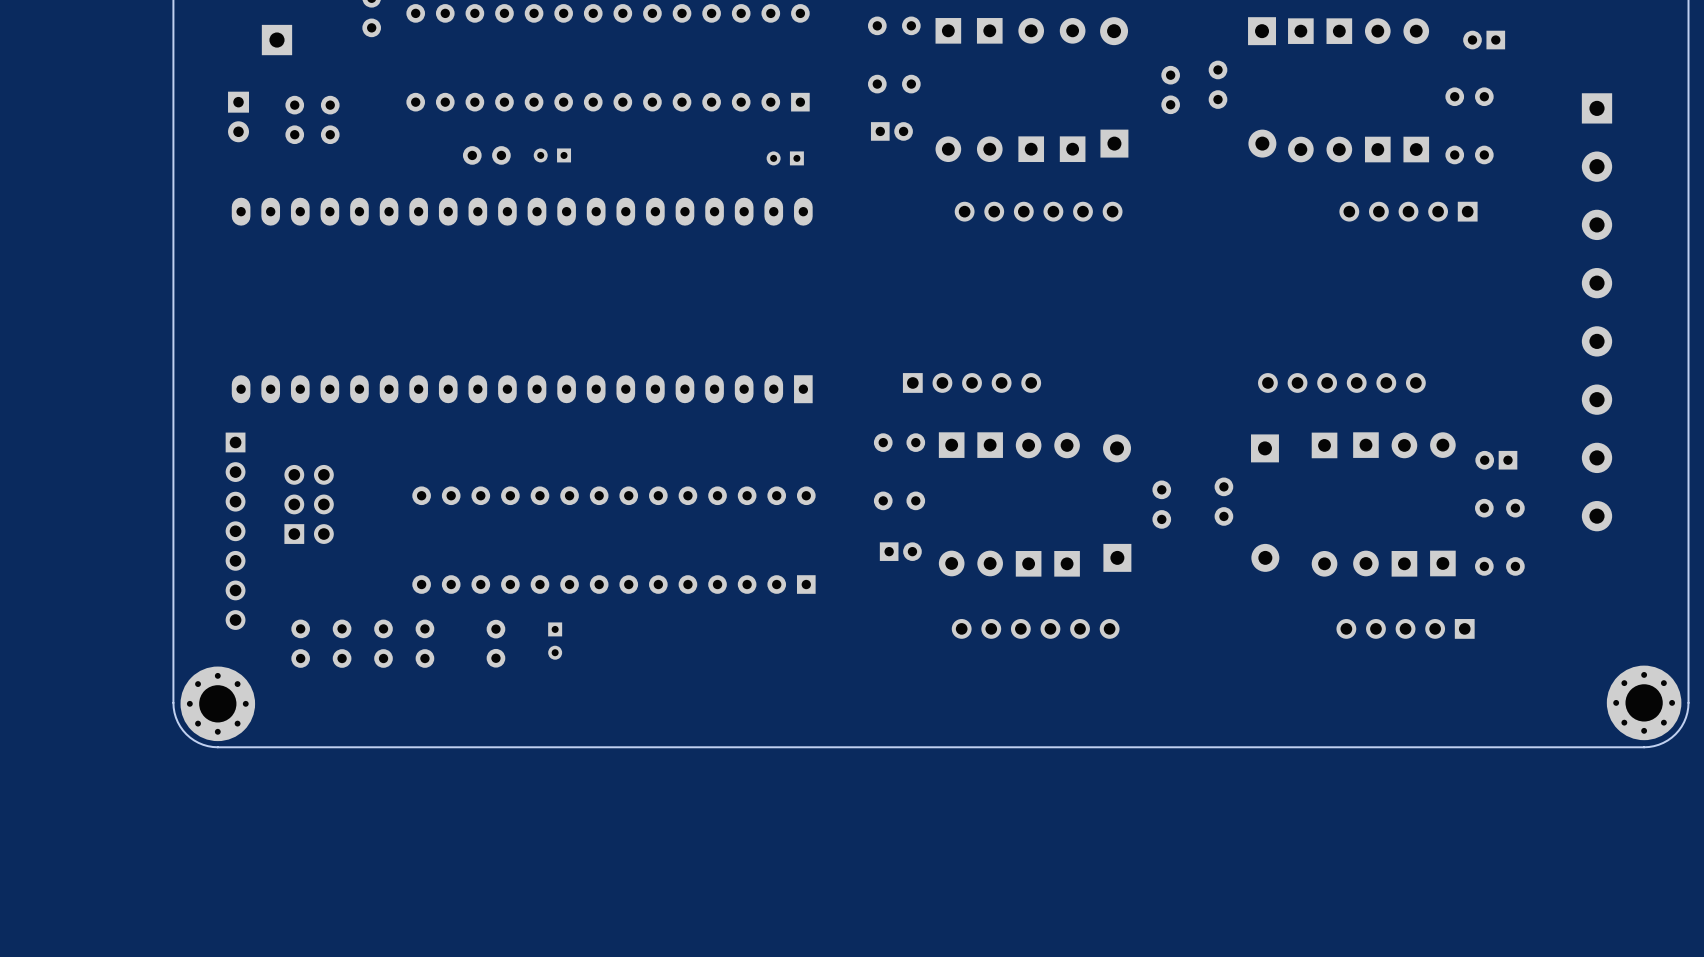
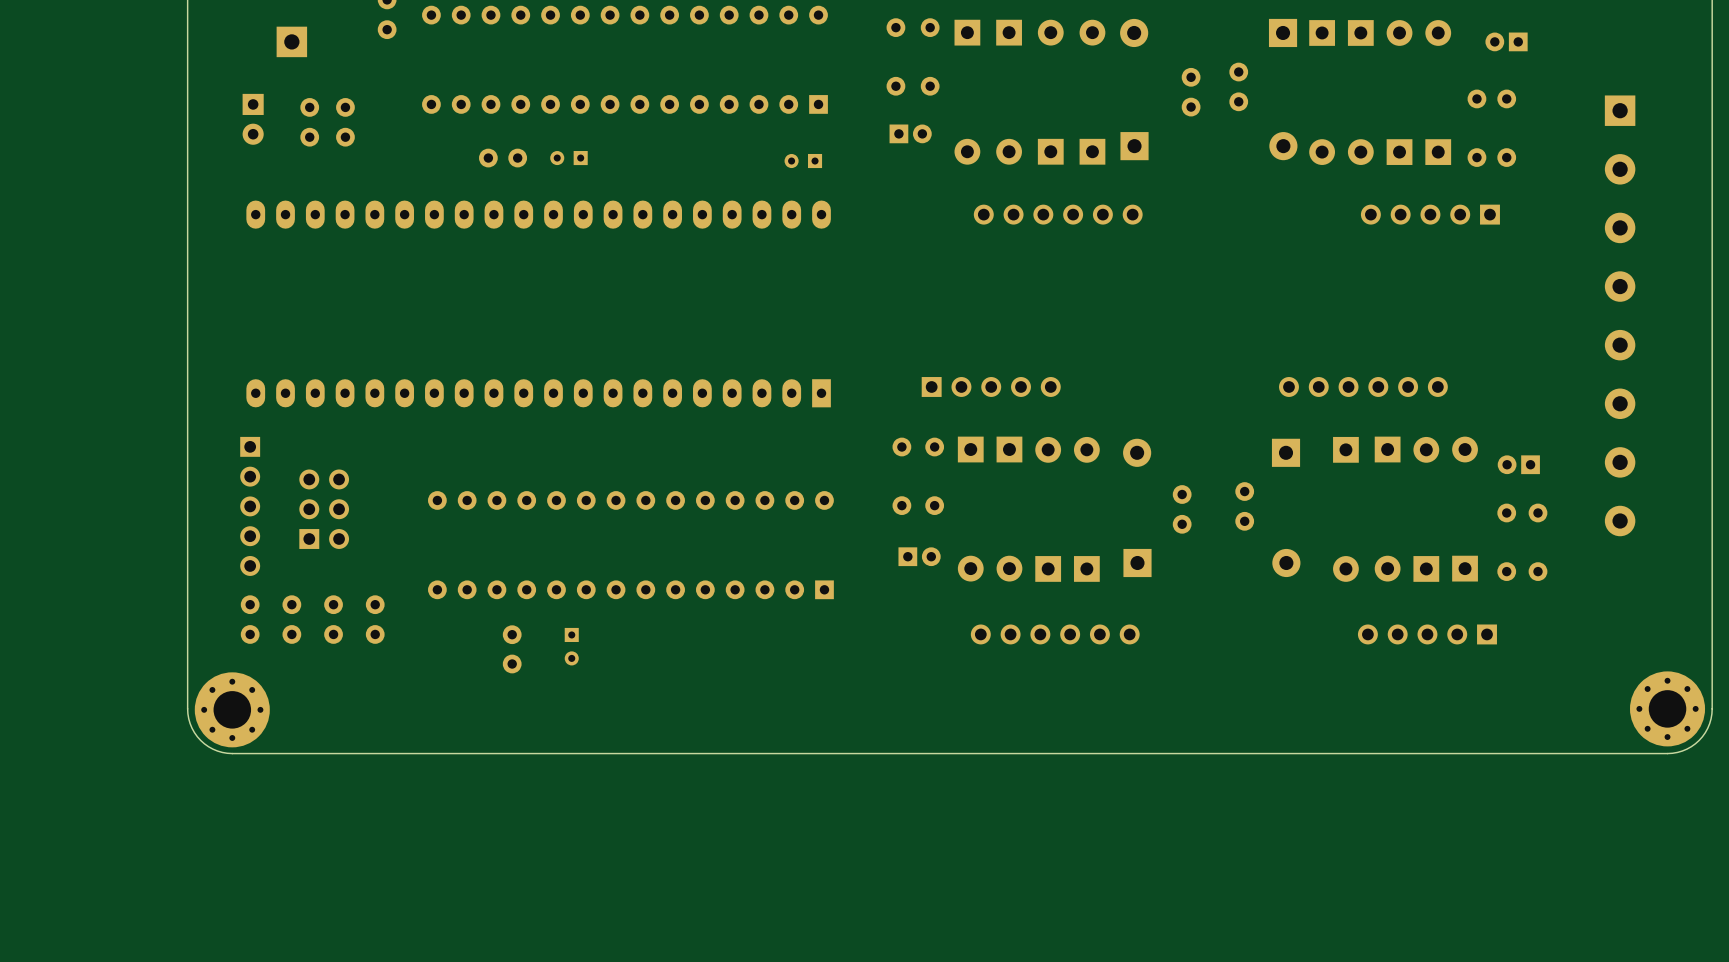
part: (235, 531) -> none
part: none -> (250, 619)
part: none -> (291, 619)
part: none -> (333, 619)
part: none -> (375, 619)
part: (300, 643) -> none
part: (342, 643) -> none
part: (383, 643) -> none
part: (424, 643) -> none

